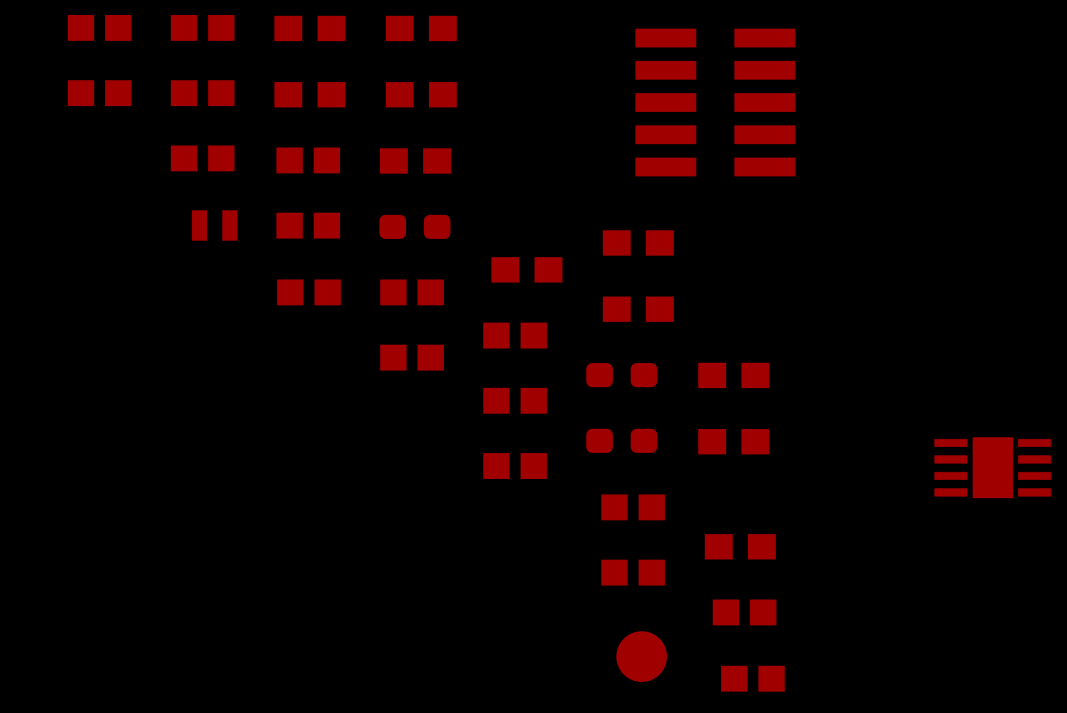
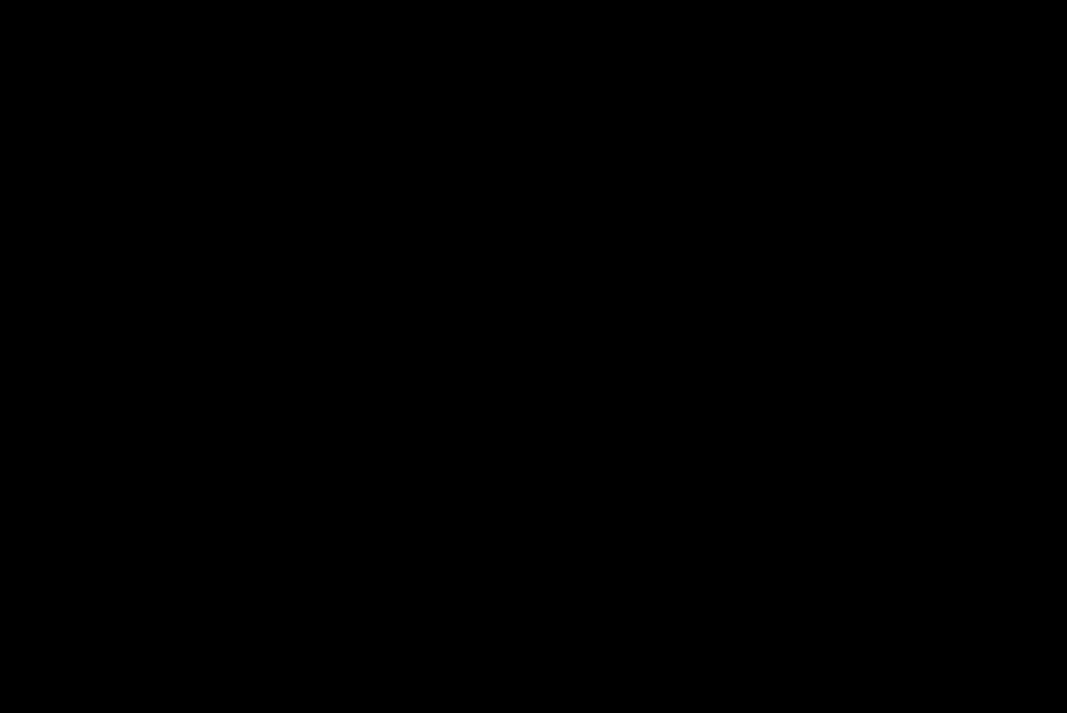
part: (99, 27) -> none
part: (202, 27) -> none
part: (309, 28) -> none
part: (421, 28) -> none
part: (99, 93) -> none
part: (202, 93) -> none
part: (309, 94) -> none
part: (421, 94) -> none
part: (715, 102) -> none
part: (202, 158) -> none
part: (308, 160) -> none
part: (415, 160) -> none
part: (214, 225) -> none
part: (308, 225) -> none
part: (414, 226) -> none
part: (638, 242) -> none
part: (526, 269) -> none
part: (309, 292) -> none
part: (412, 292) -> none
part: (638, 309) -> none
part: (515, 335) -> none
part: (412, 357) -> none
part: (621, 375) -> none
part: (733, 375) -> none
part: (515, 400) -> none
part: (621, 440) -> none
part: (733, 441) -> none
part: (515, 466) -> none
part: (992, 467) -> none
part: (633, 507) -> none
part: (740, 546) -> none
part: (633, 572) -> none
part: (744, 612) -> none
part: (641, 656) -> none
part: (752, 678) -> none

